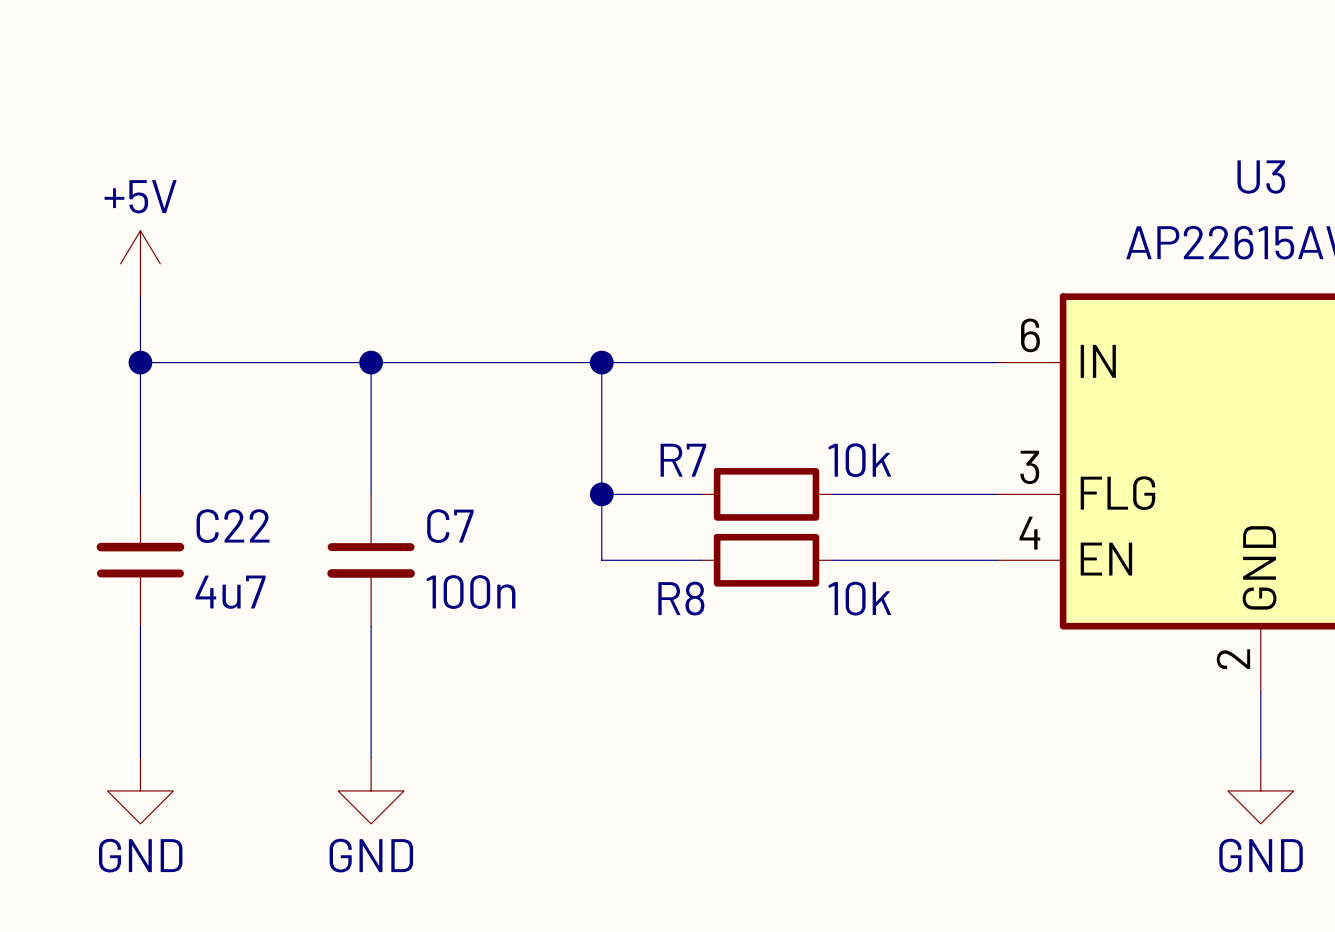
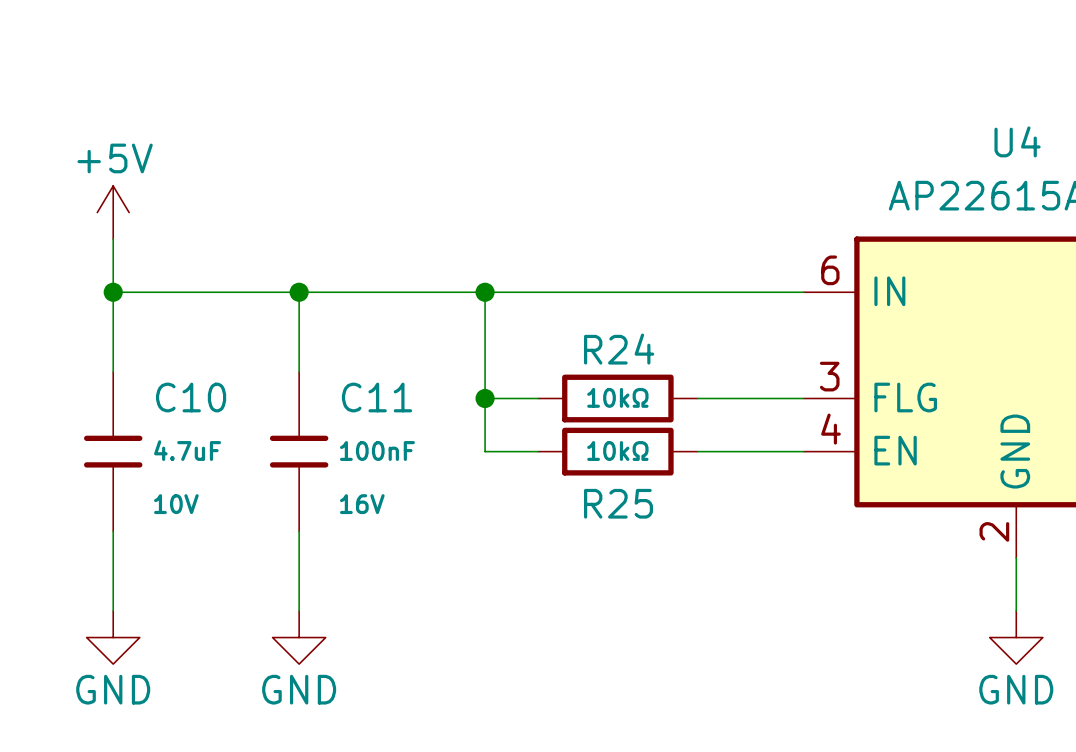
U3 name: U3 (1261, 177) -> U4 (1017, 141)
R7: (766, 494) -> none
R24: none -> 10kΩ (617, 398)
C22: (140, 560) -> none
C10: none -> 4.7uF (113, 451)
C7: (371, 560) -> none
C11: none -> 100nF (299, 451)
R8: (766, 560) -> none
R25: none -> 10kΩ (617, 451)

